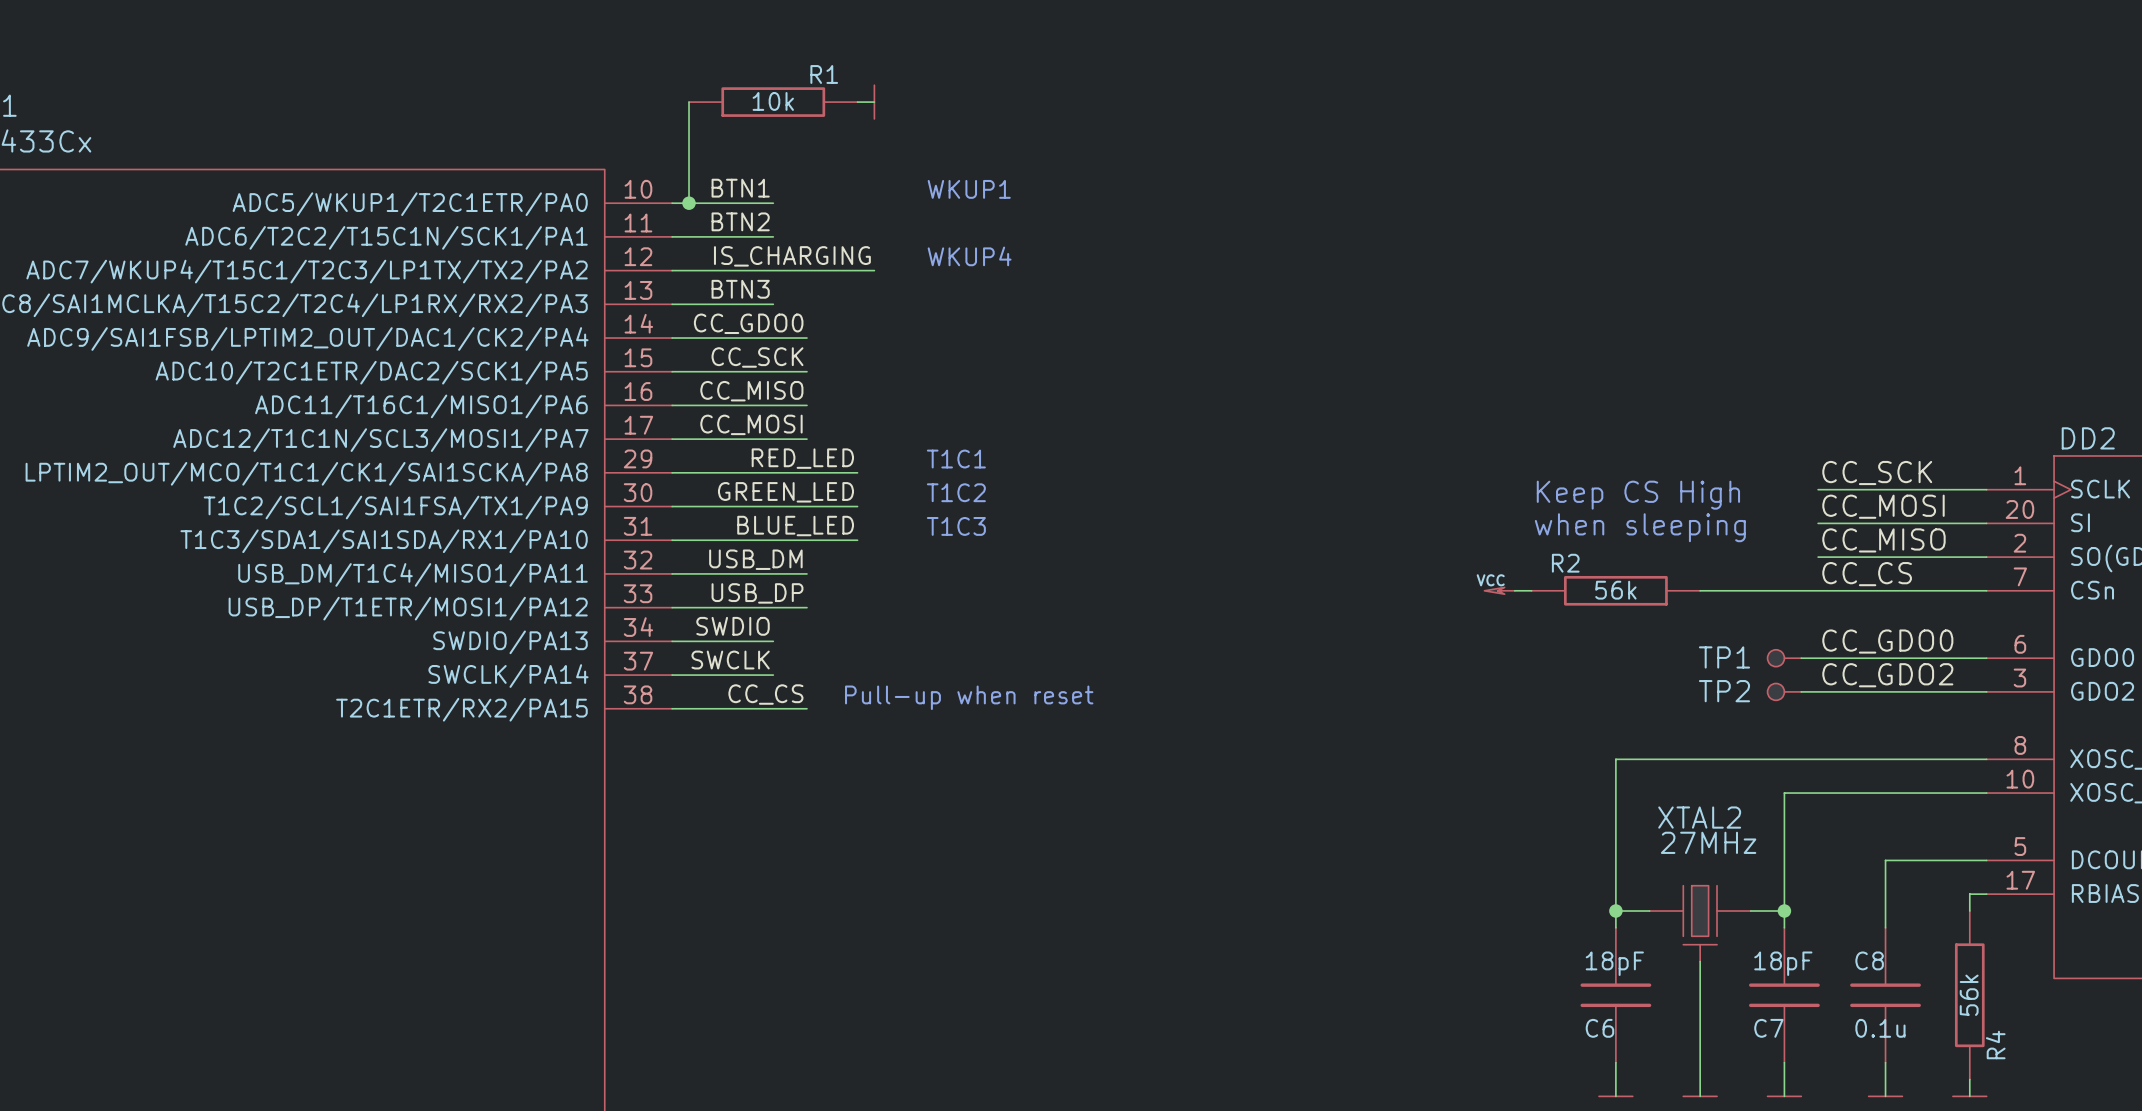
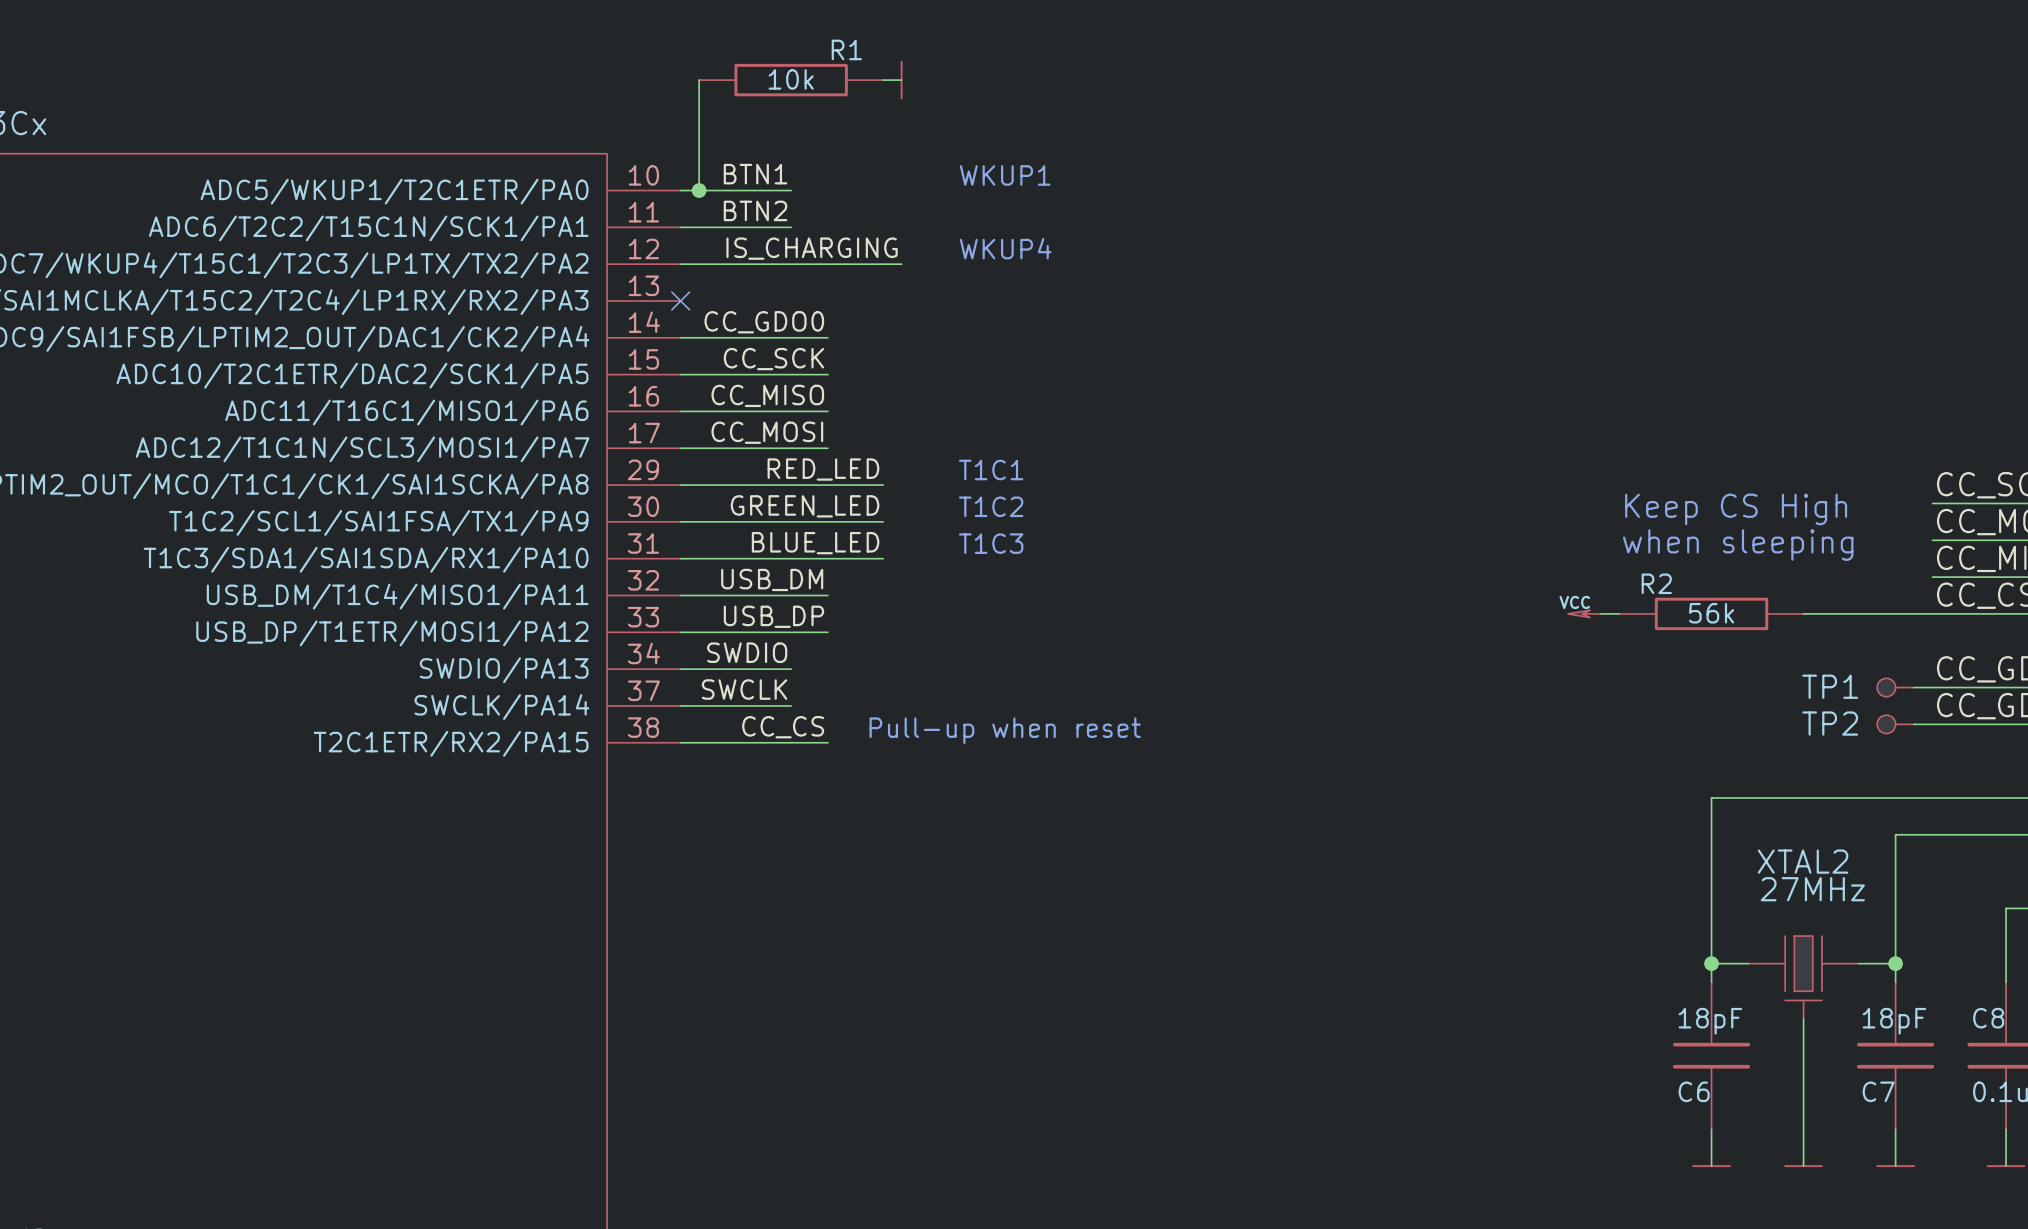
label: BTN3 (740, 289) -> none
wire: (672, 304) (773, 304) -> none
no-connect mark: none -> (680, 300)

